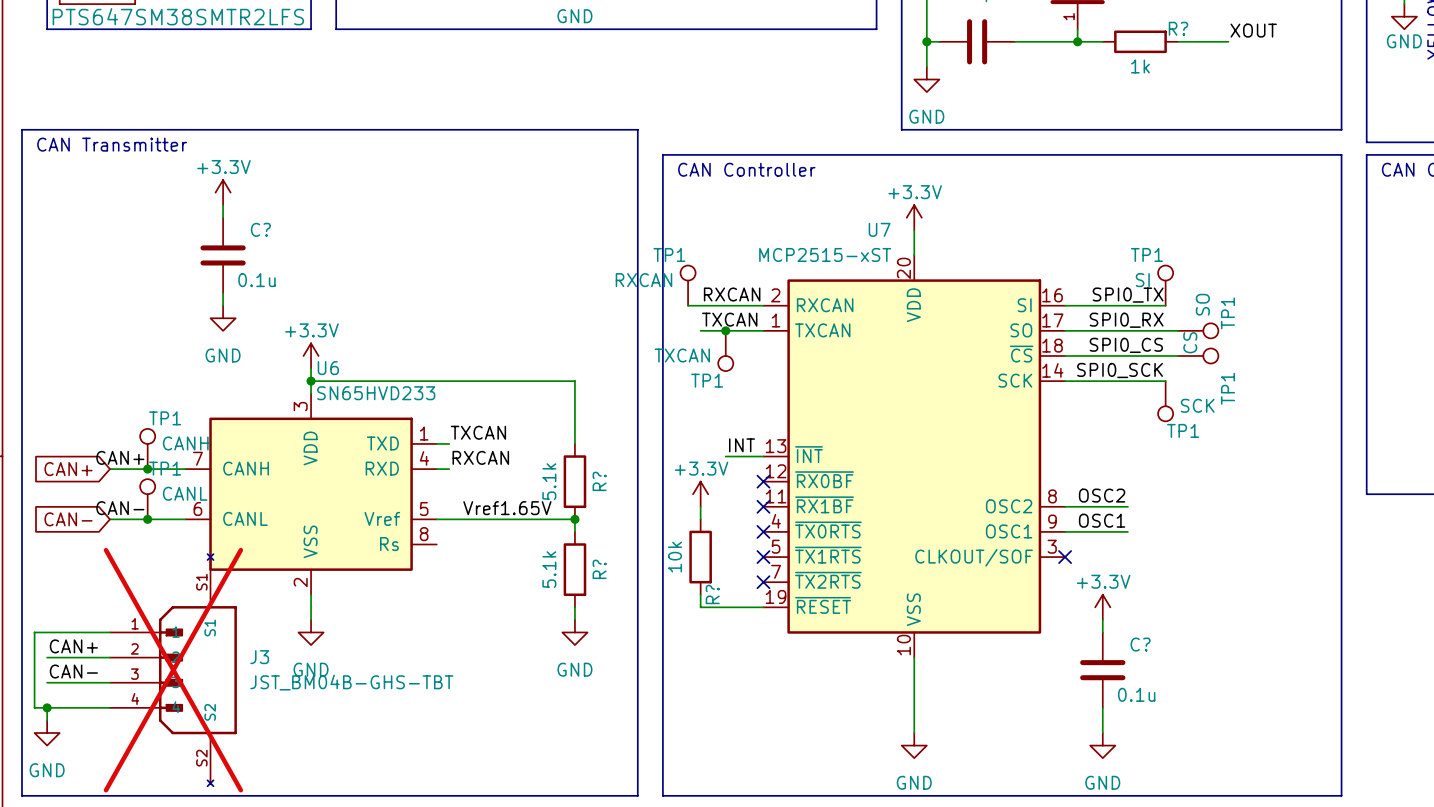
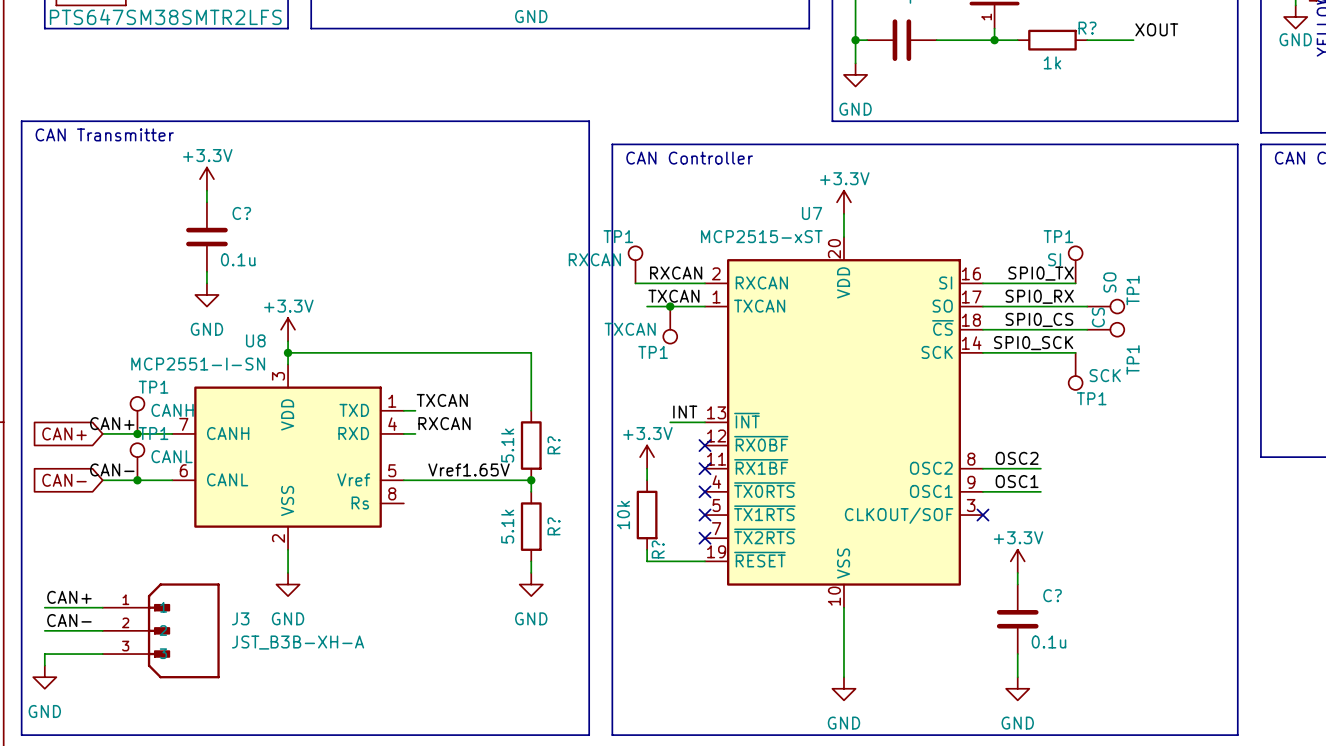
U6 name: U6 (328, 368) -> U8 (255, 340)
U6 value: SN65HVD233 (376, 393) -> MCP2551-I-SN (198, 364)
J3 symbol: [109, 554, 237, 787] -> [102, 583, 220, 679]
wire: (109, 632) (34, 632) (34, 707) (47, 707) -> none
J3 do-not-place cross: (173, 670) -> none
J3 value: JST_BM04B-GHS-TBT (351, 682) -> JST_B3B-XH-A (298, 642)
junction: (47, 707) -> none

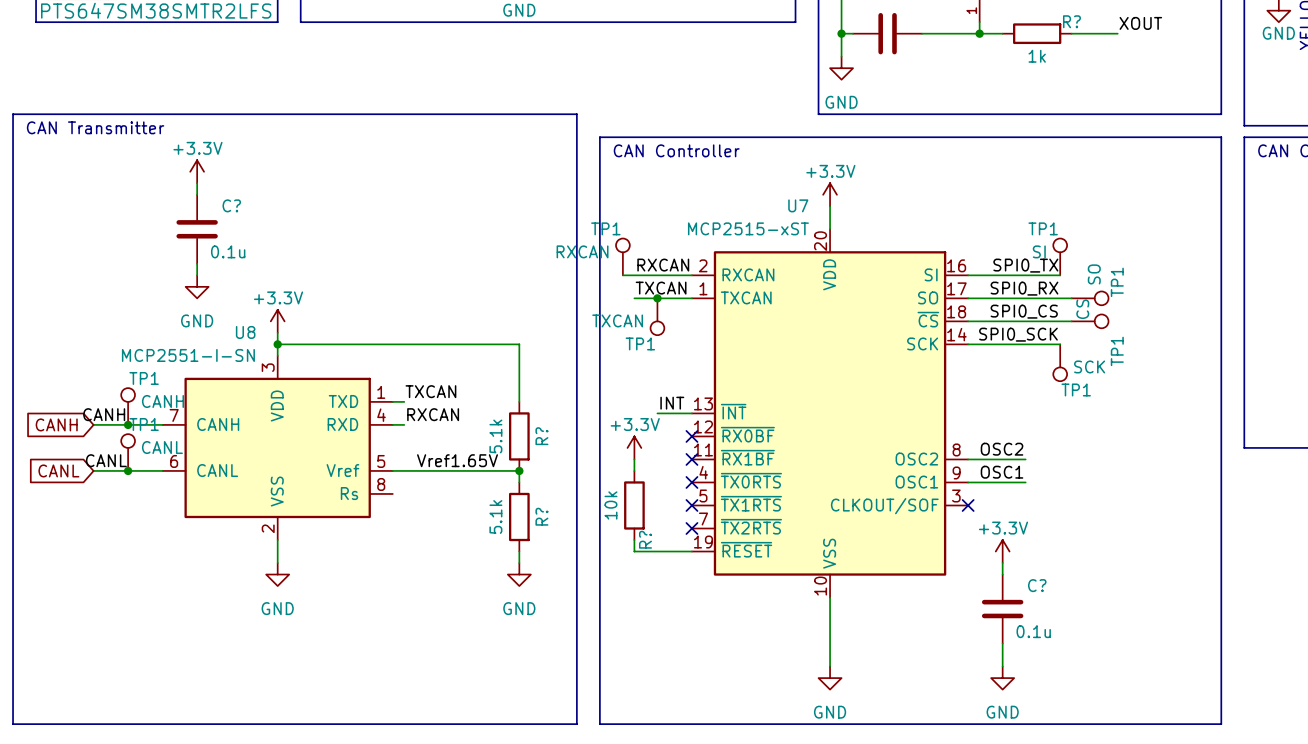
label: CAN+ (112, 423) -> CANH (104, 414)
global label: CAN+ (64, 433) -> CANH (56, 424)
label: CAN- (112, 469) -> CANL (106, 460)
global label: CAN- (64, 480) -> CANL (58, 470)
label: CAN+ (69, 597) -> none
wire: (44, 607) (102, 607) -> none
label: CAN- (69, 620) -> none
wire: (44, 630) (102, 630) -> none
J3: JST_B3B-XH-A (161, 630) -> none
wire: (102, 654) (44, 654) (44, 665) -> none
power symbol: GND (44, 677) -> none

